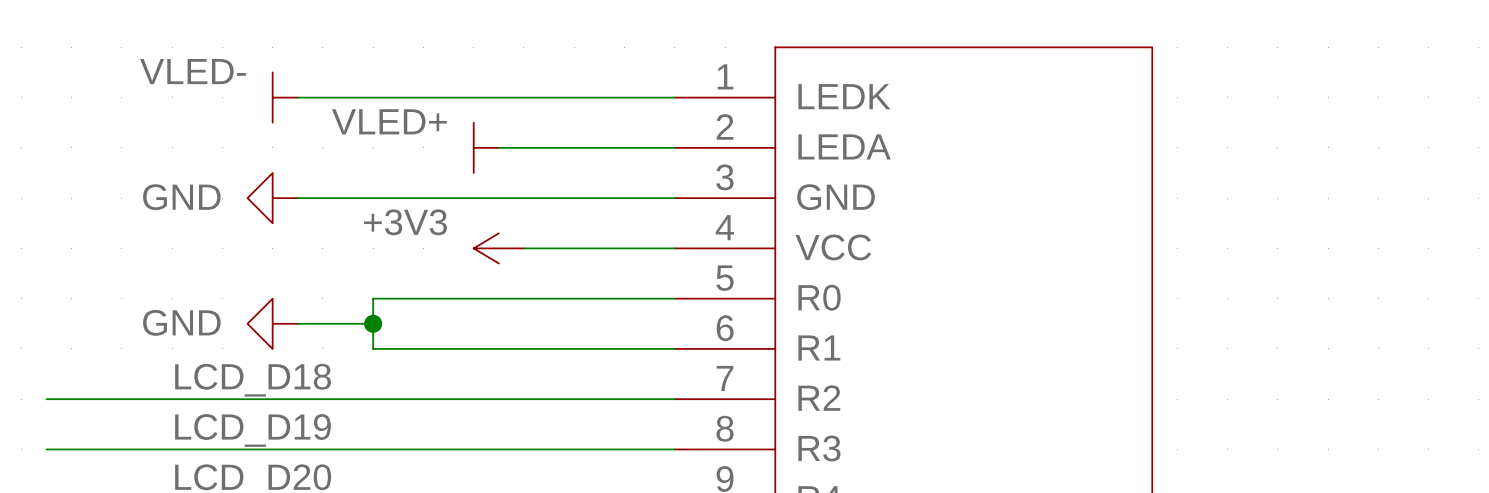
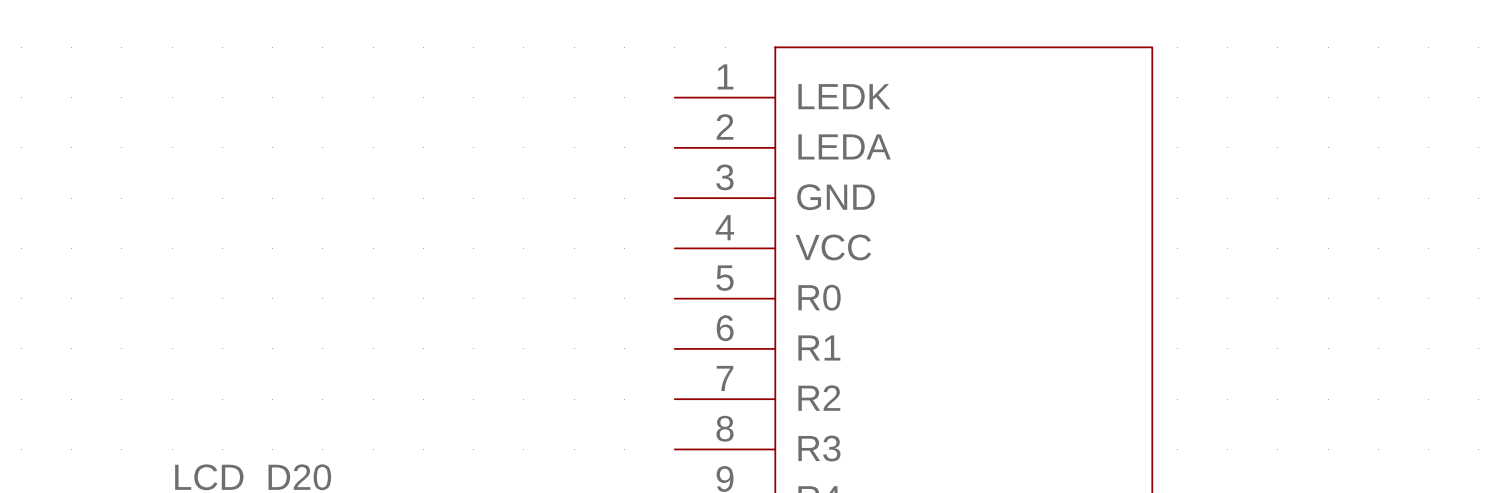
power symbol: VLED- (285, 97) -> none
wire: (297, 97) (674, 97) -> none
power symbol: VLED+ (486, 147) -> none
wire: (498, 147) (674, 147) -> none
power symbol: GND (272, 198) -> none
wire: (297, 198) (674, 198) -> none
power symbol: +3V3 (498, 248) -> none
wire: (523, 248) (674, 248) -> none
wire: (674, 298) (373, 298) (373, 348) (674, 348) -> none
power symbol: GND (272, 323) -> none
wire: (297, 323) (373, 323) -> none
junction: (373, 323) -> none
label: LCD_D18 (253, 380) -> none
wire: (46, 399) (674, 399) -> none
label: LCD_D19 (252, 430) -> none
wire: (46, 449) (674, 449) -> none

